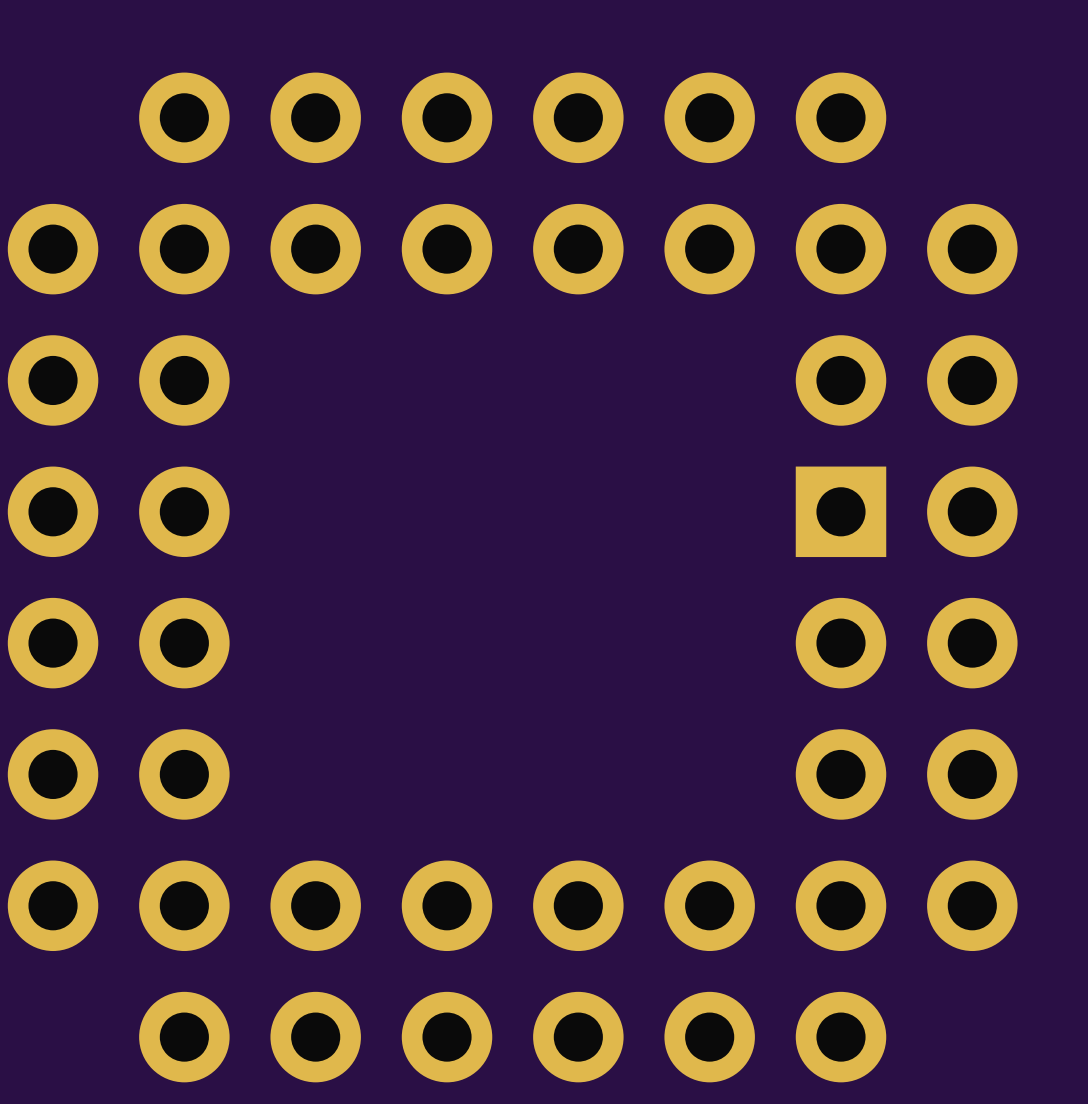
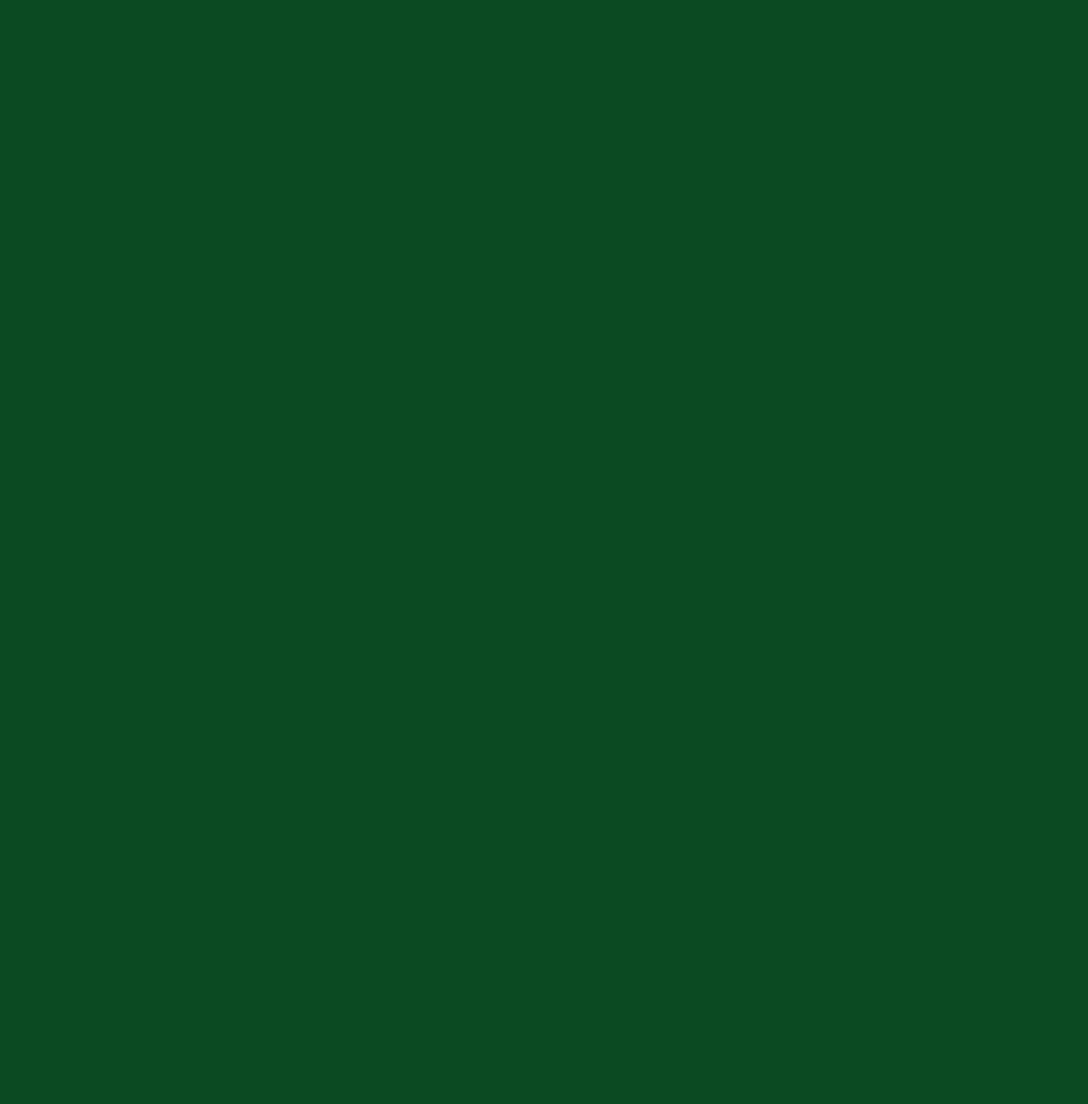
part: (512, 577) -> none

